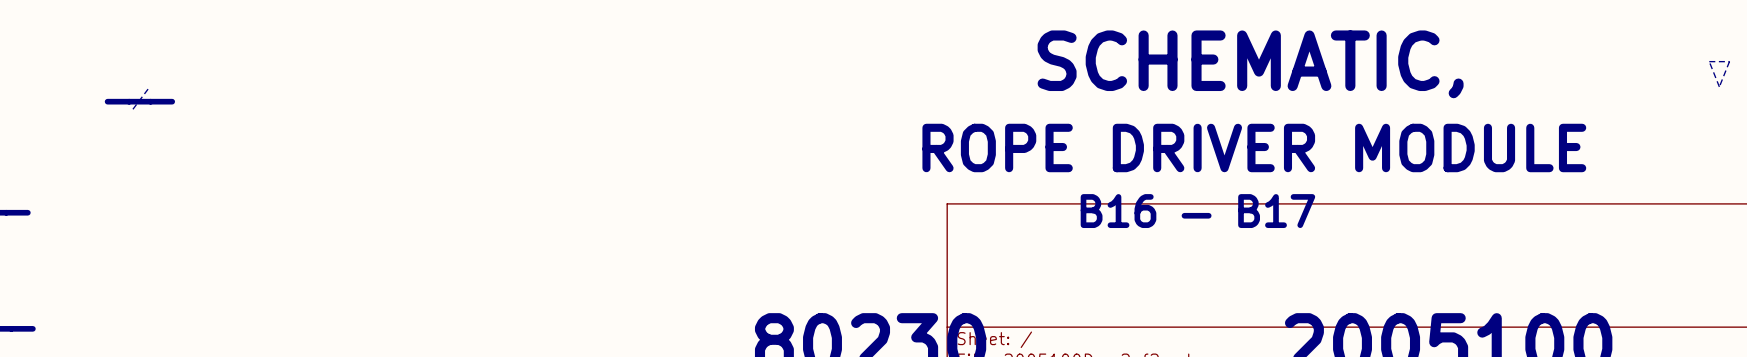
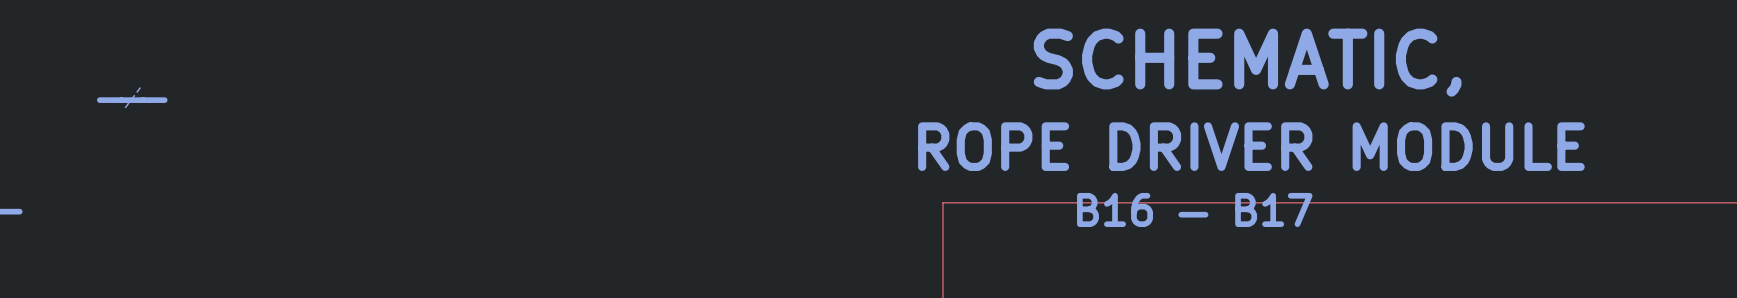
line: (1709, 61) (1719, 86) (1729, 61) (1709, 61) -> none

